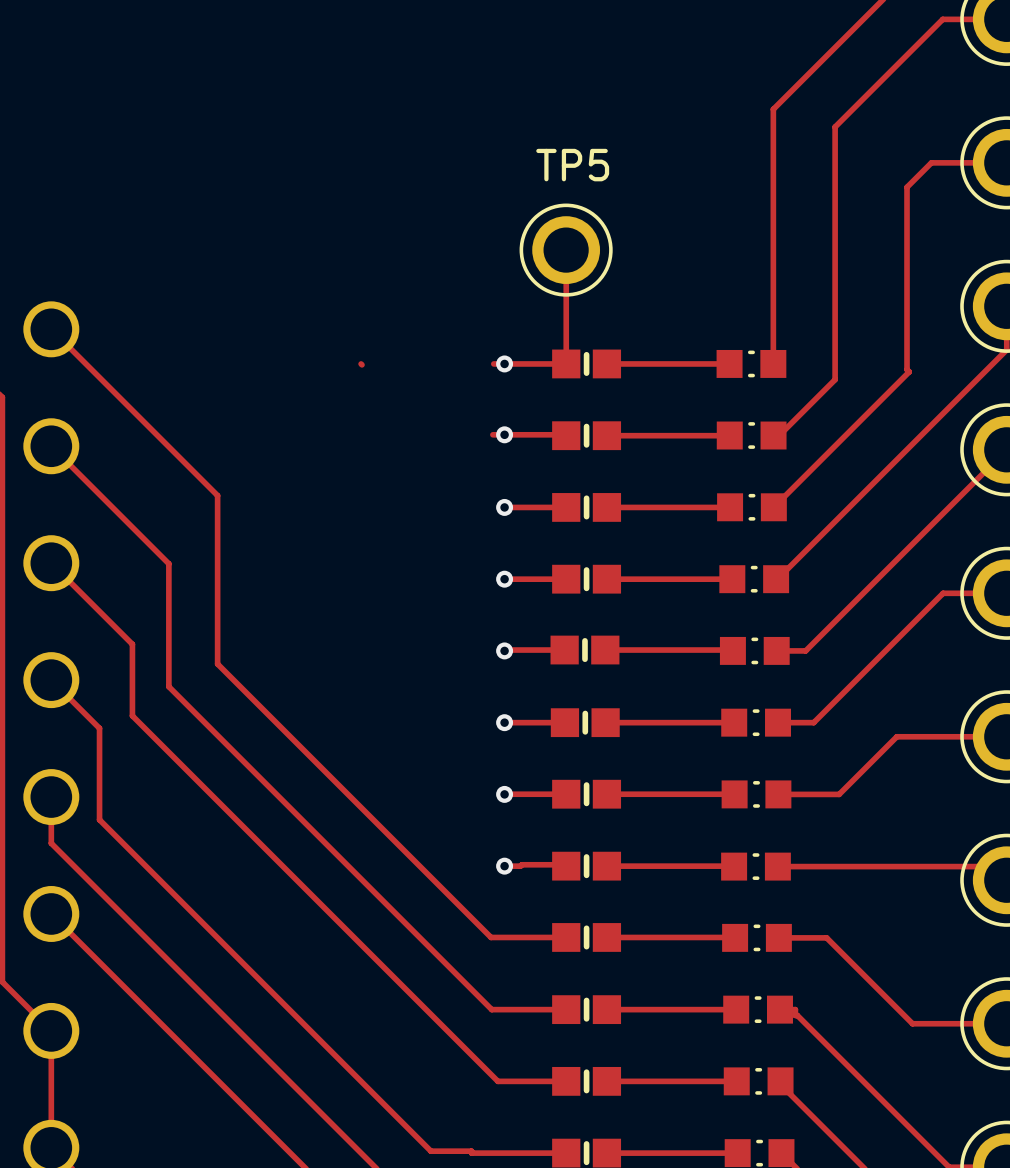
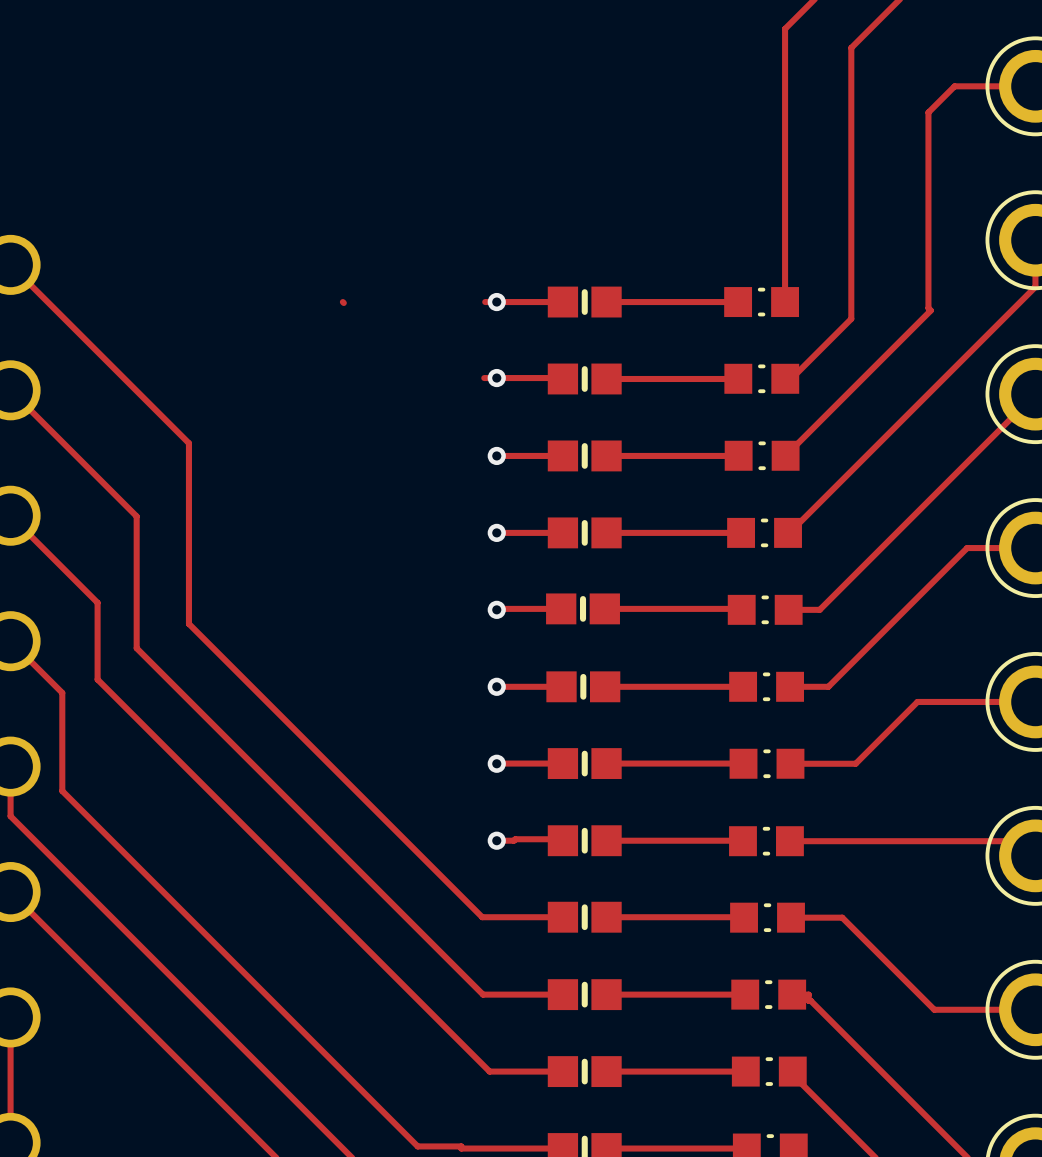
track: (566, 250) (566, 363) -> none
TP5: (566, 250) -> none

